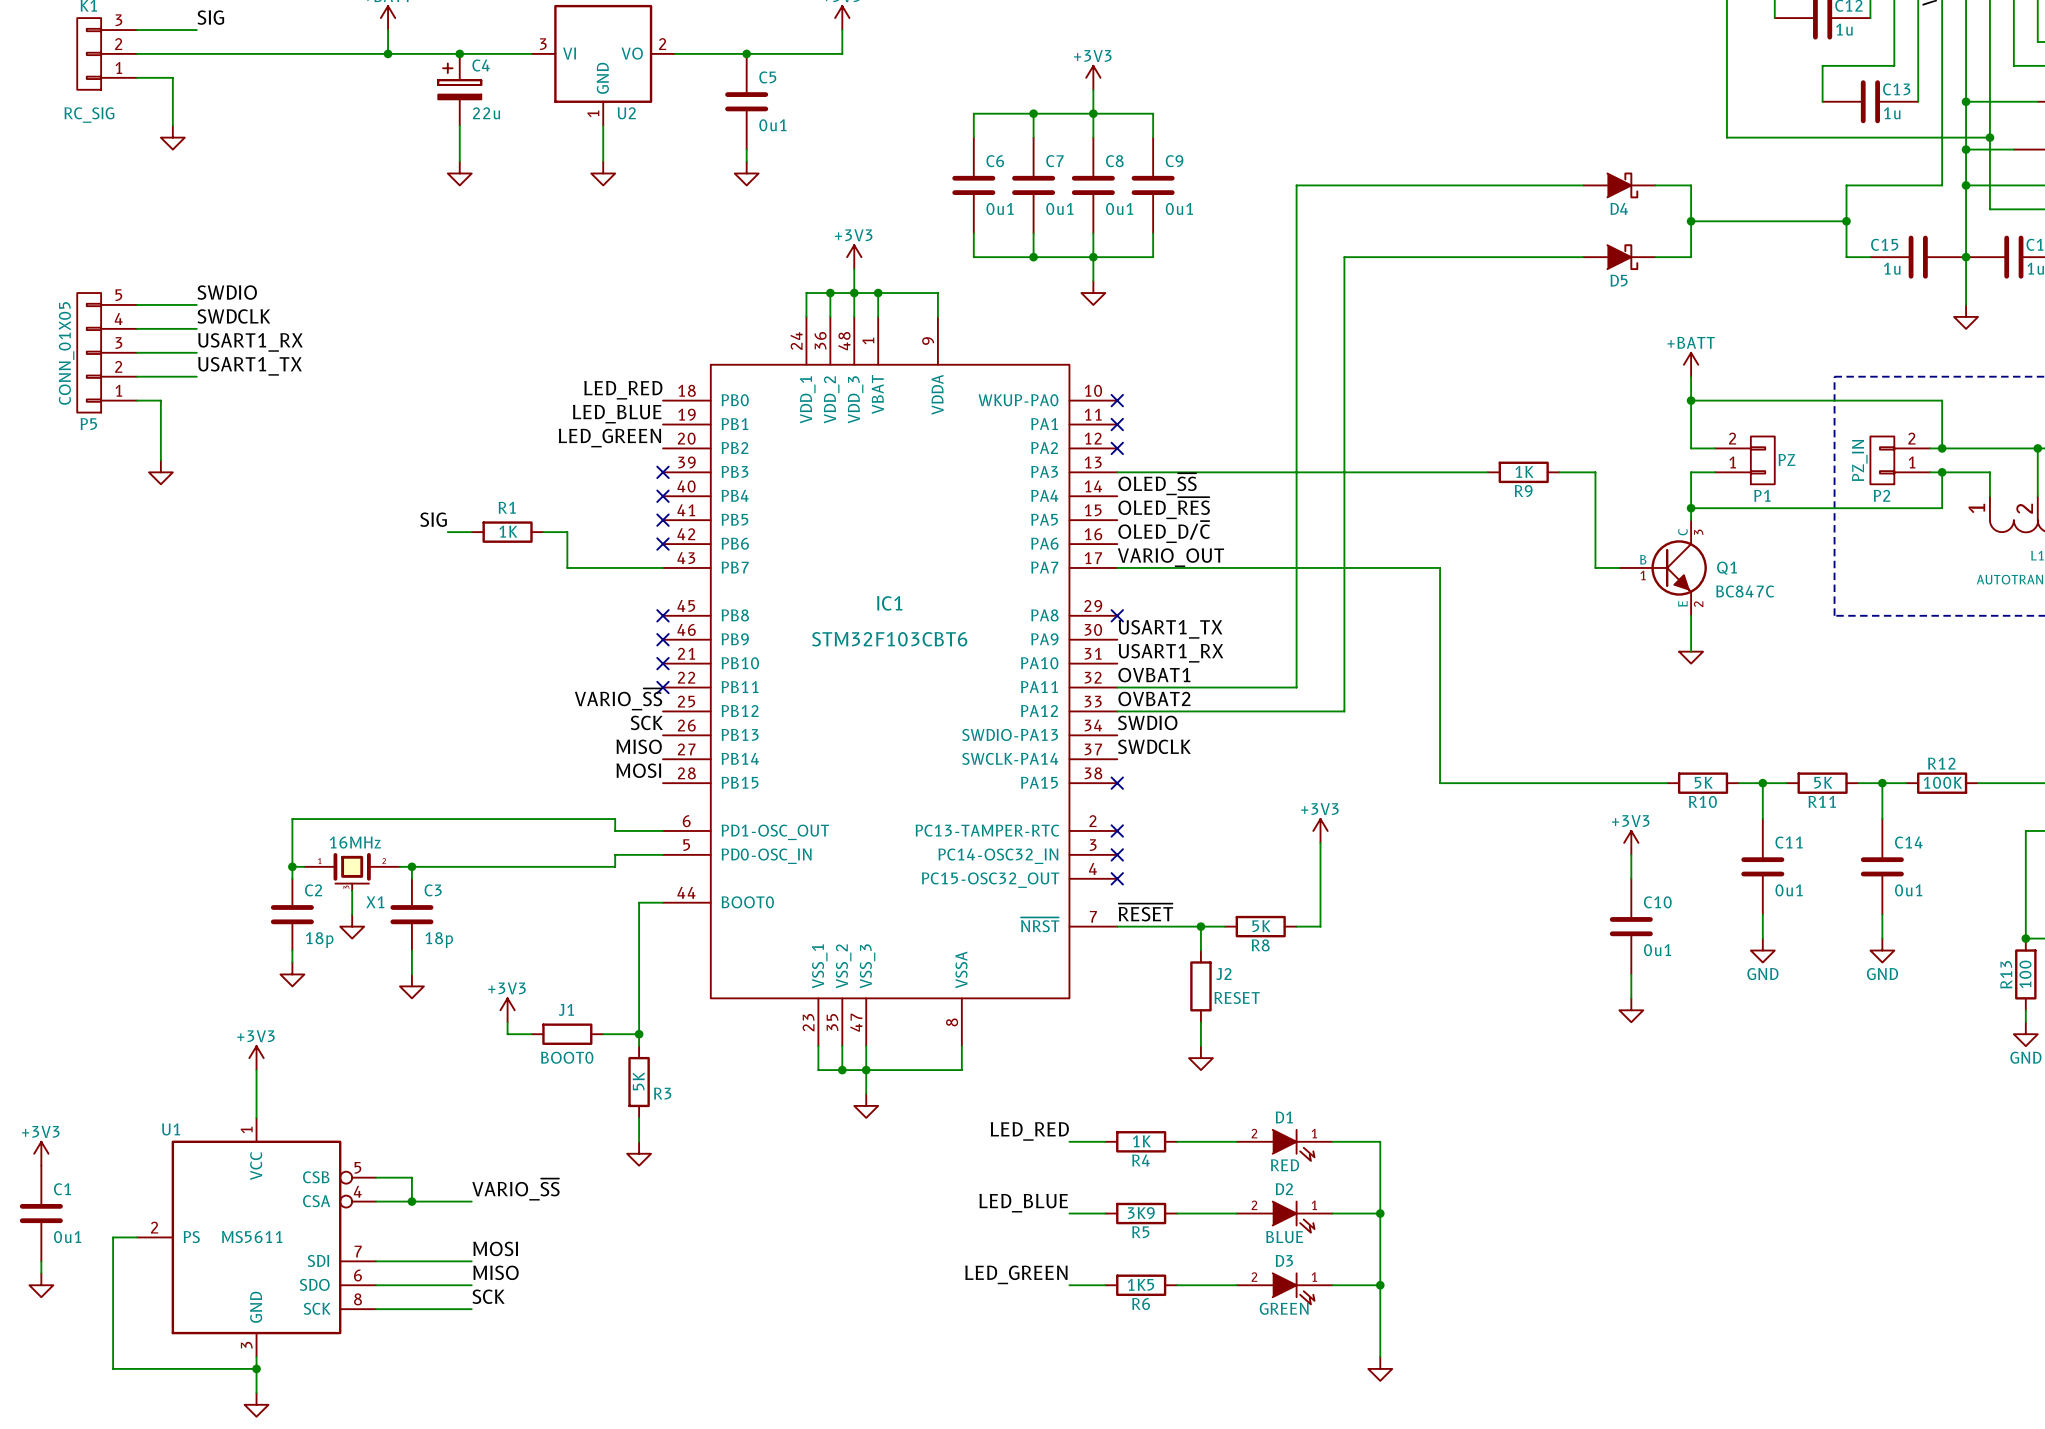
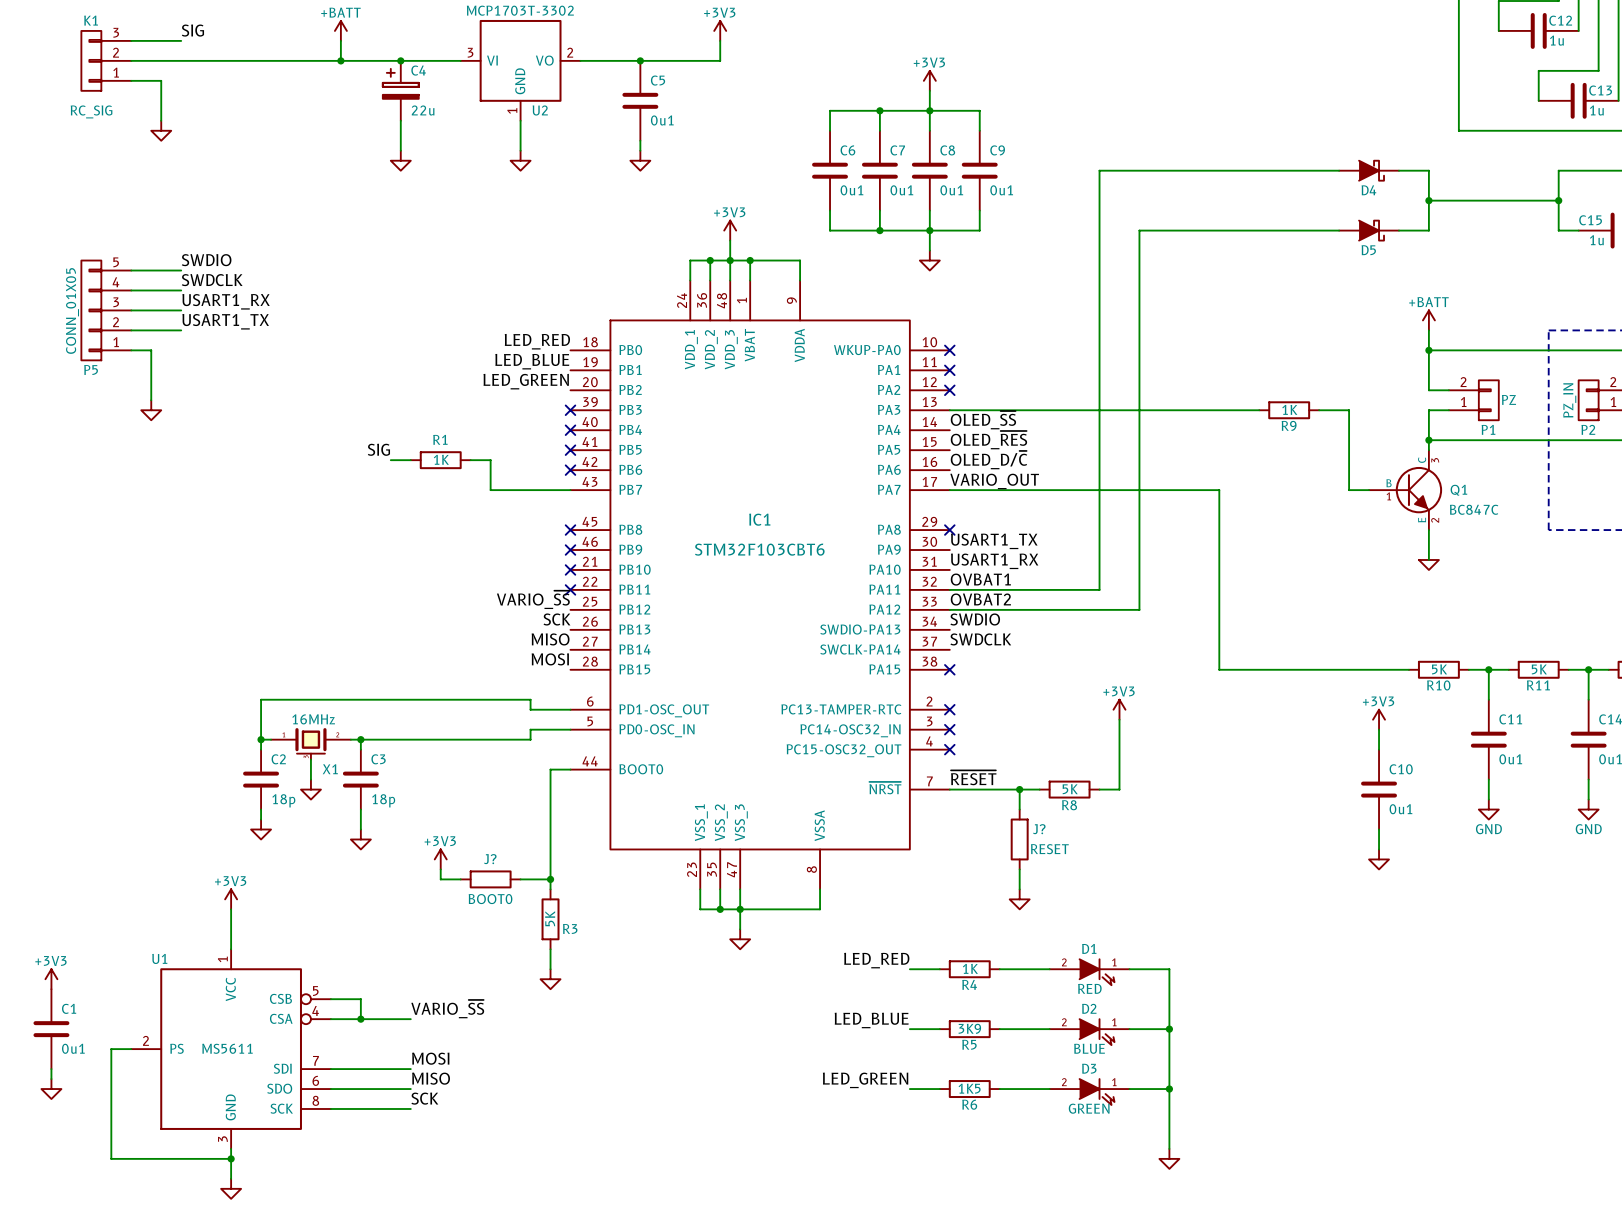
J2 name: J2 (1223, 974) -> J? (1039, 829)
J1 name: J1 (566, 1009) -> J? (490, 859)

